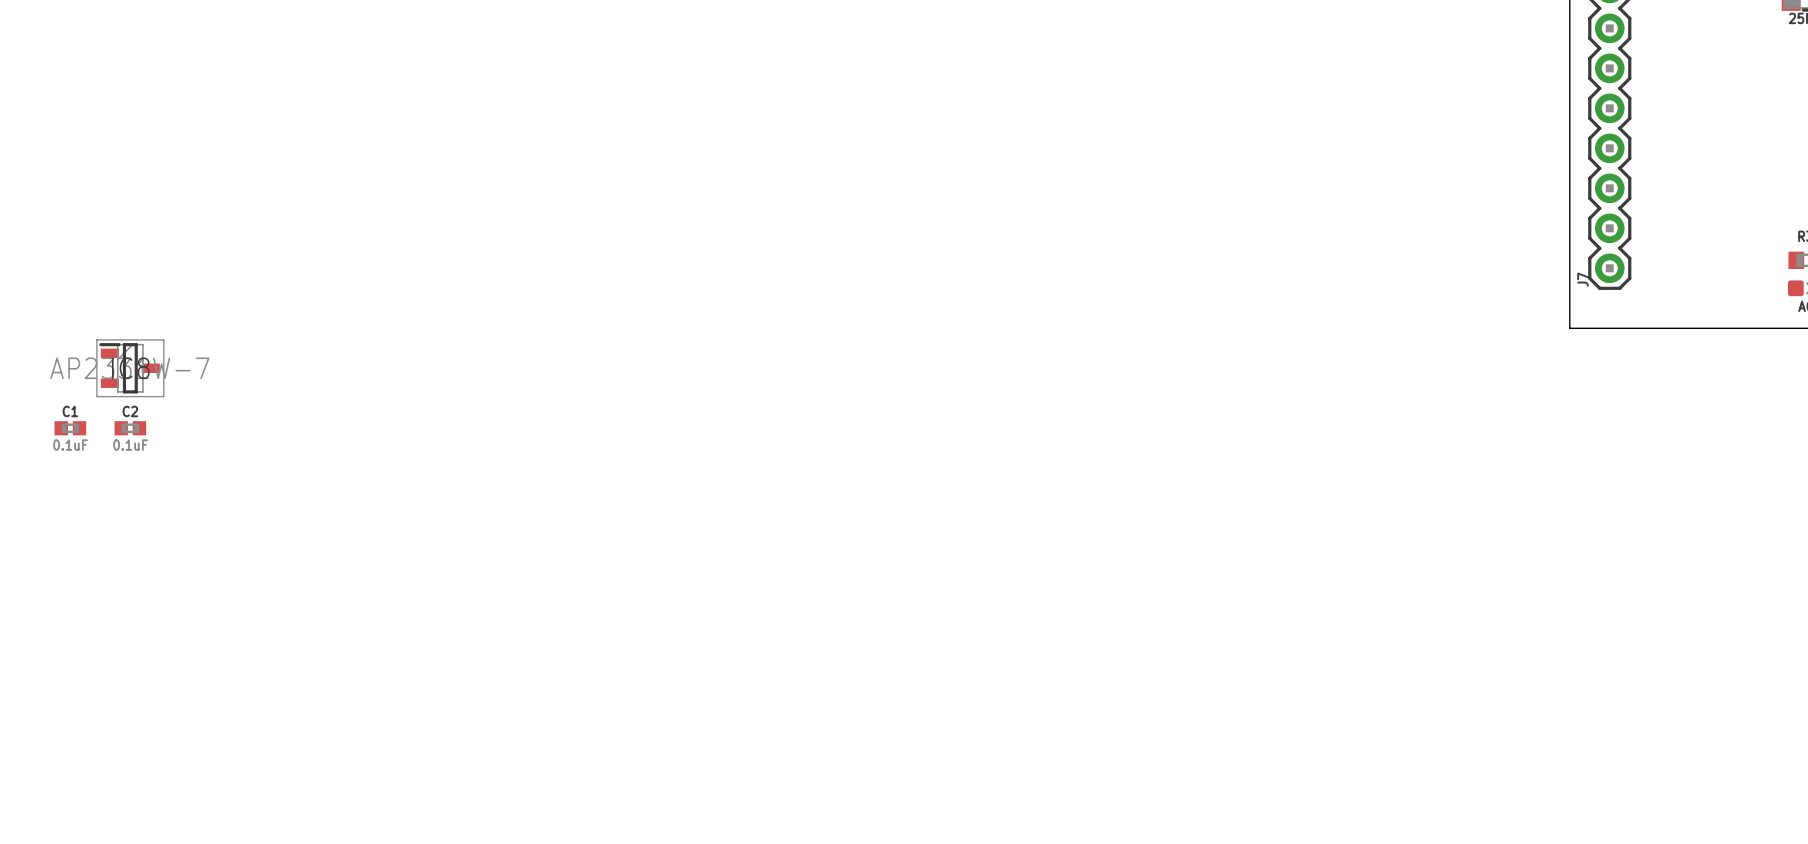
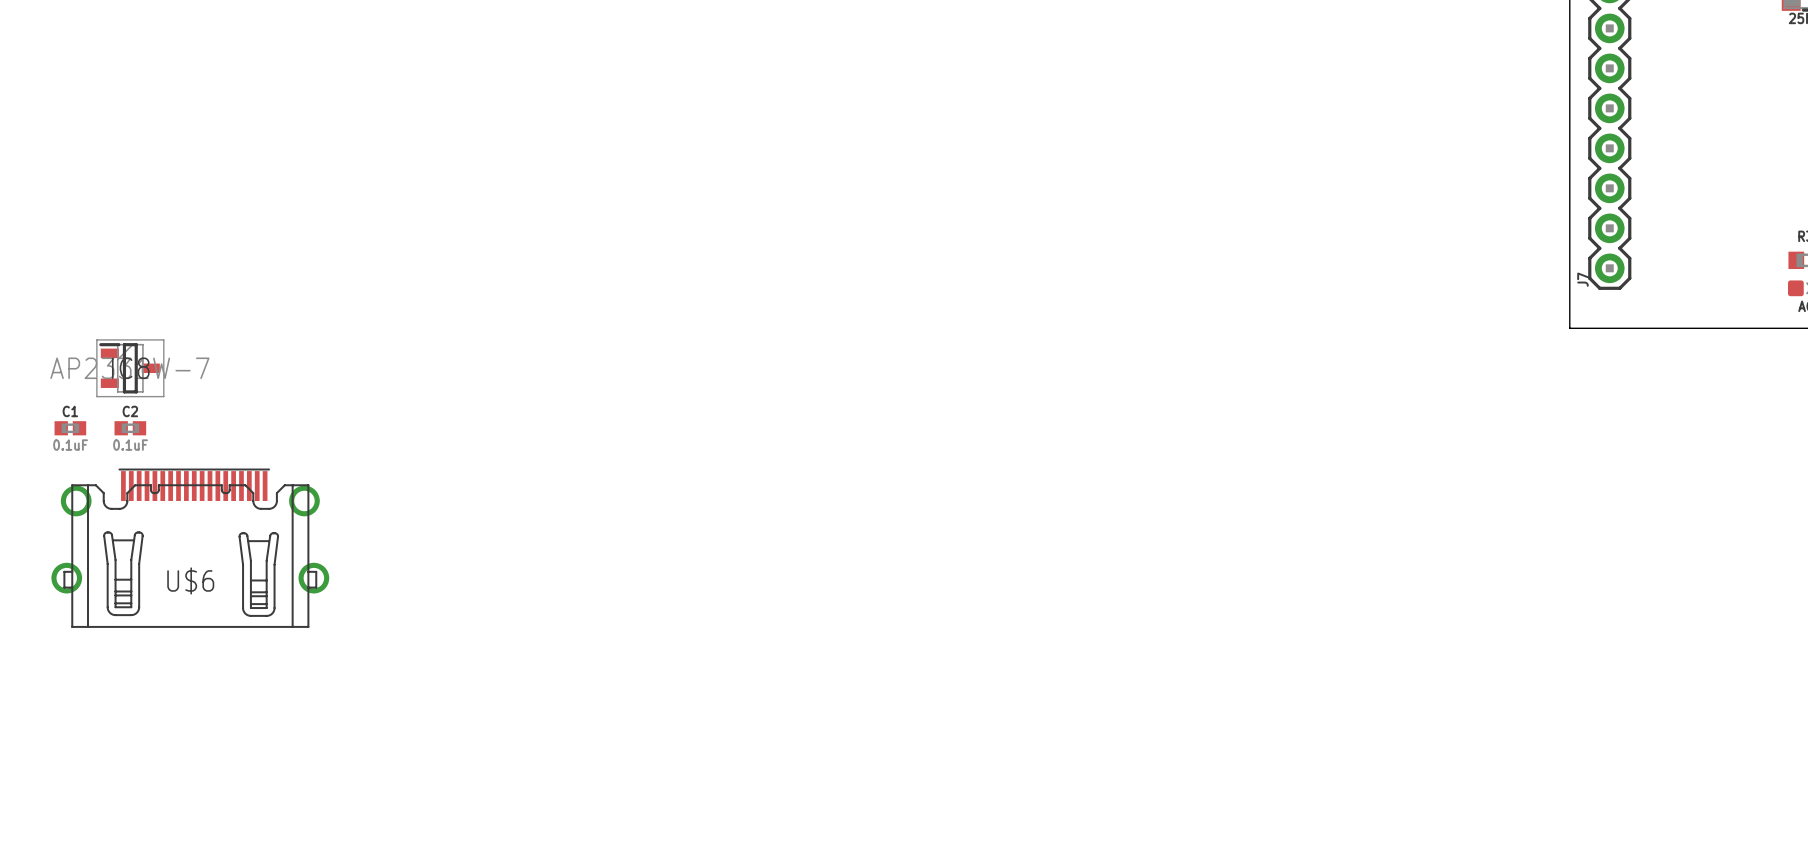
U$6: none -> (190, 548)

